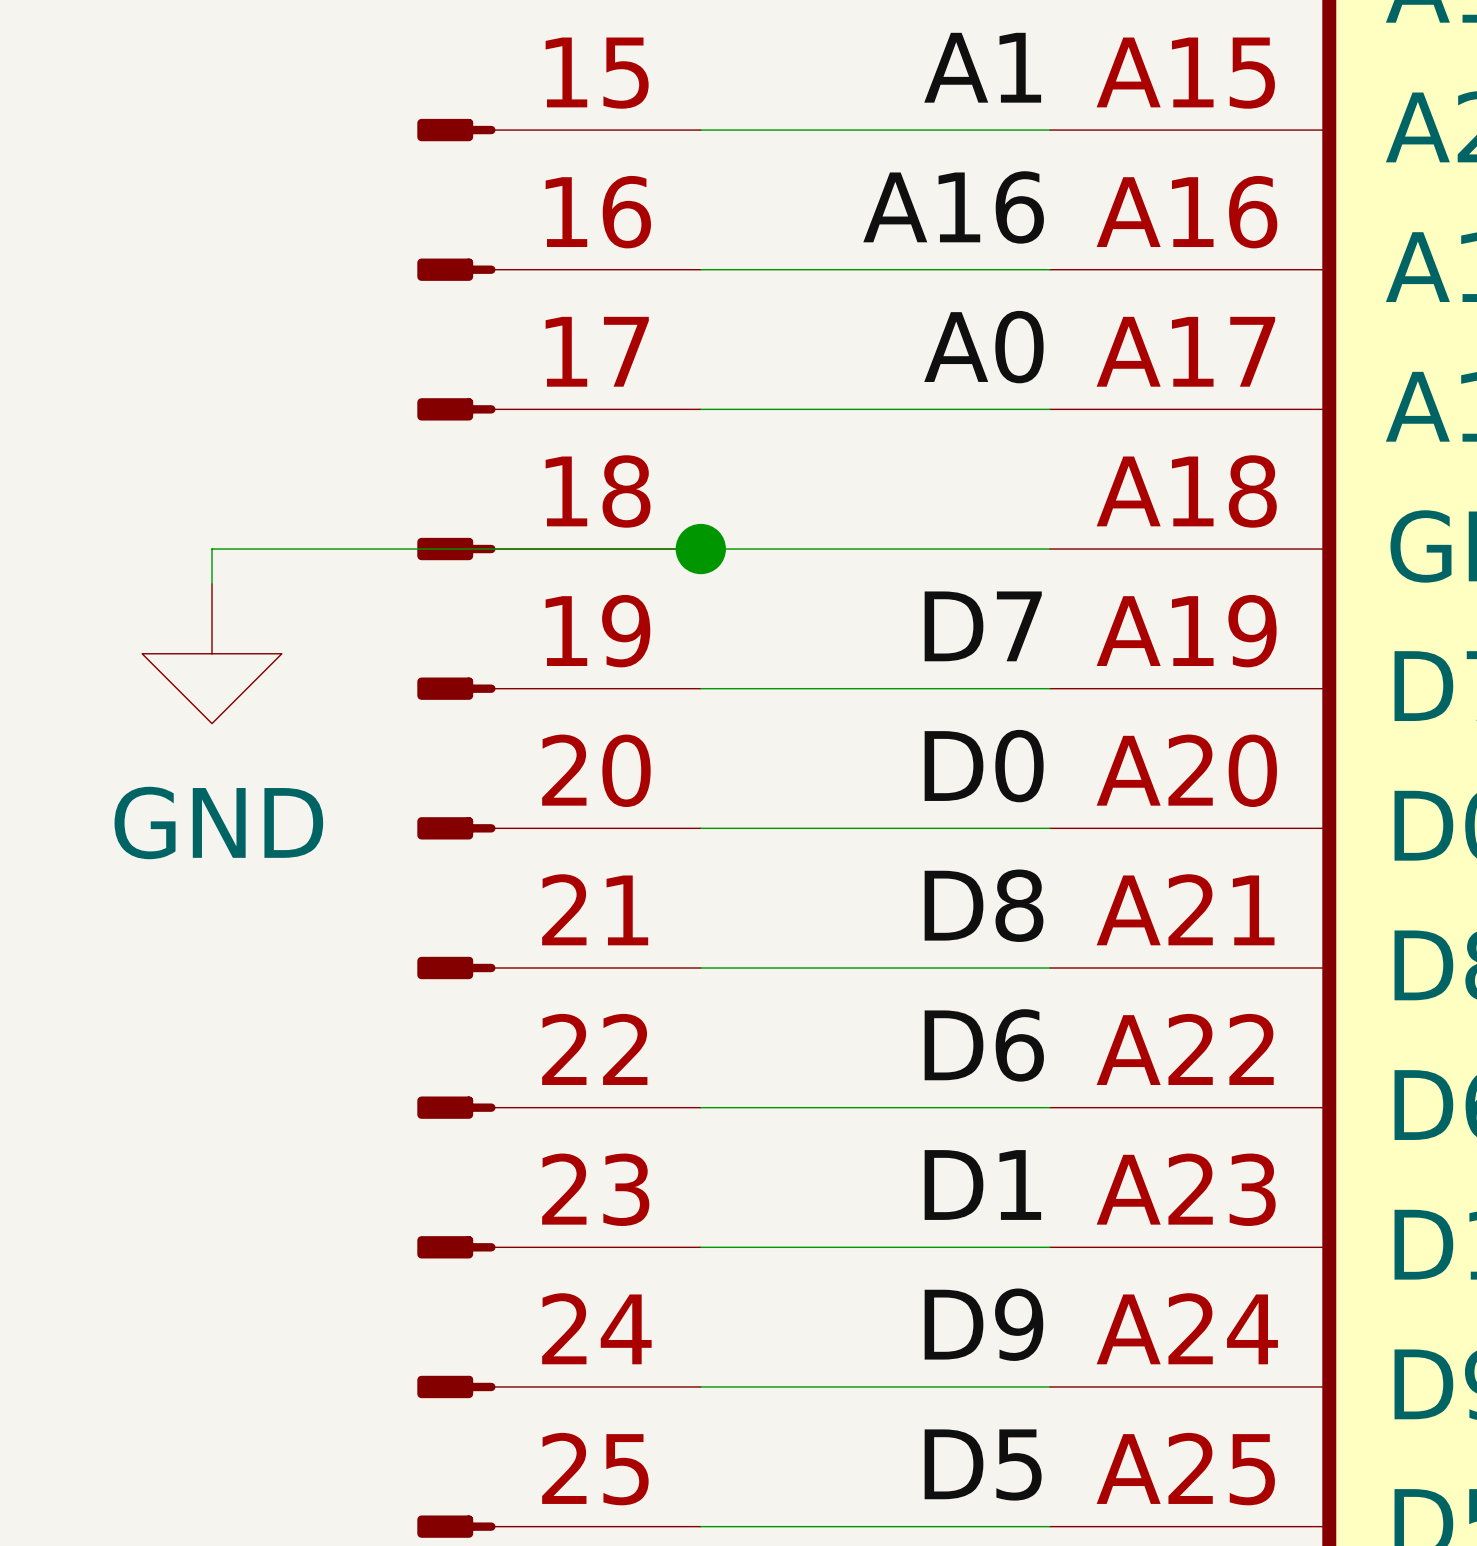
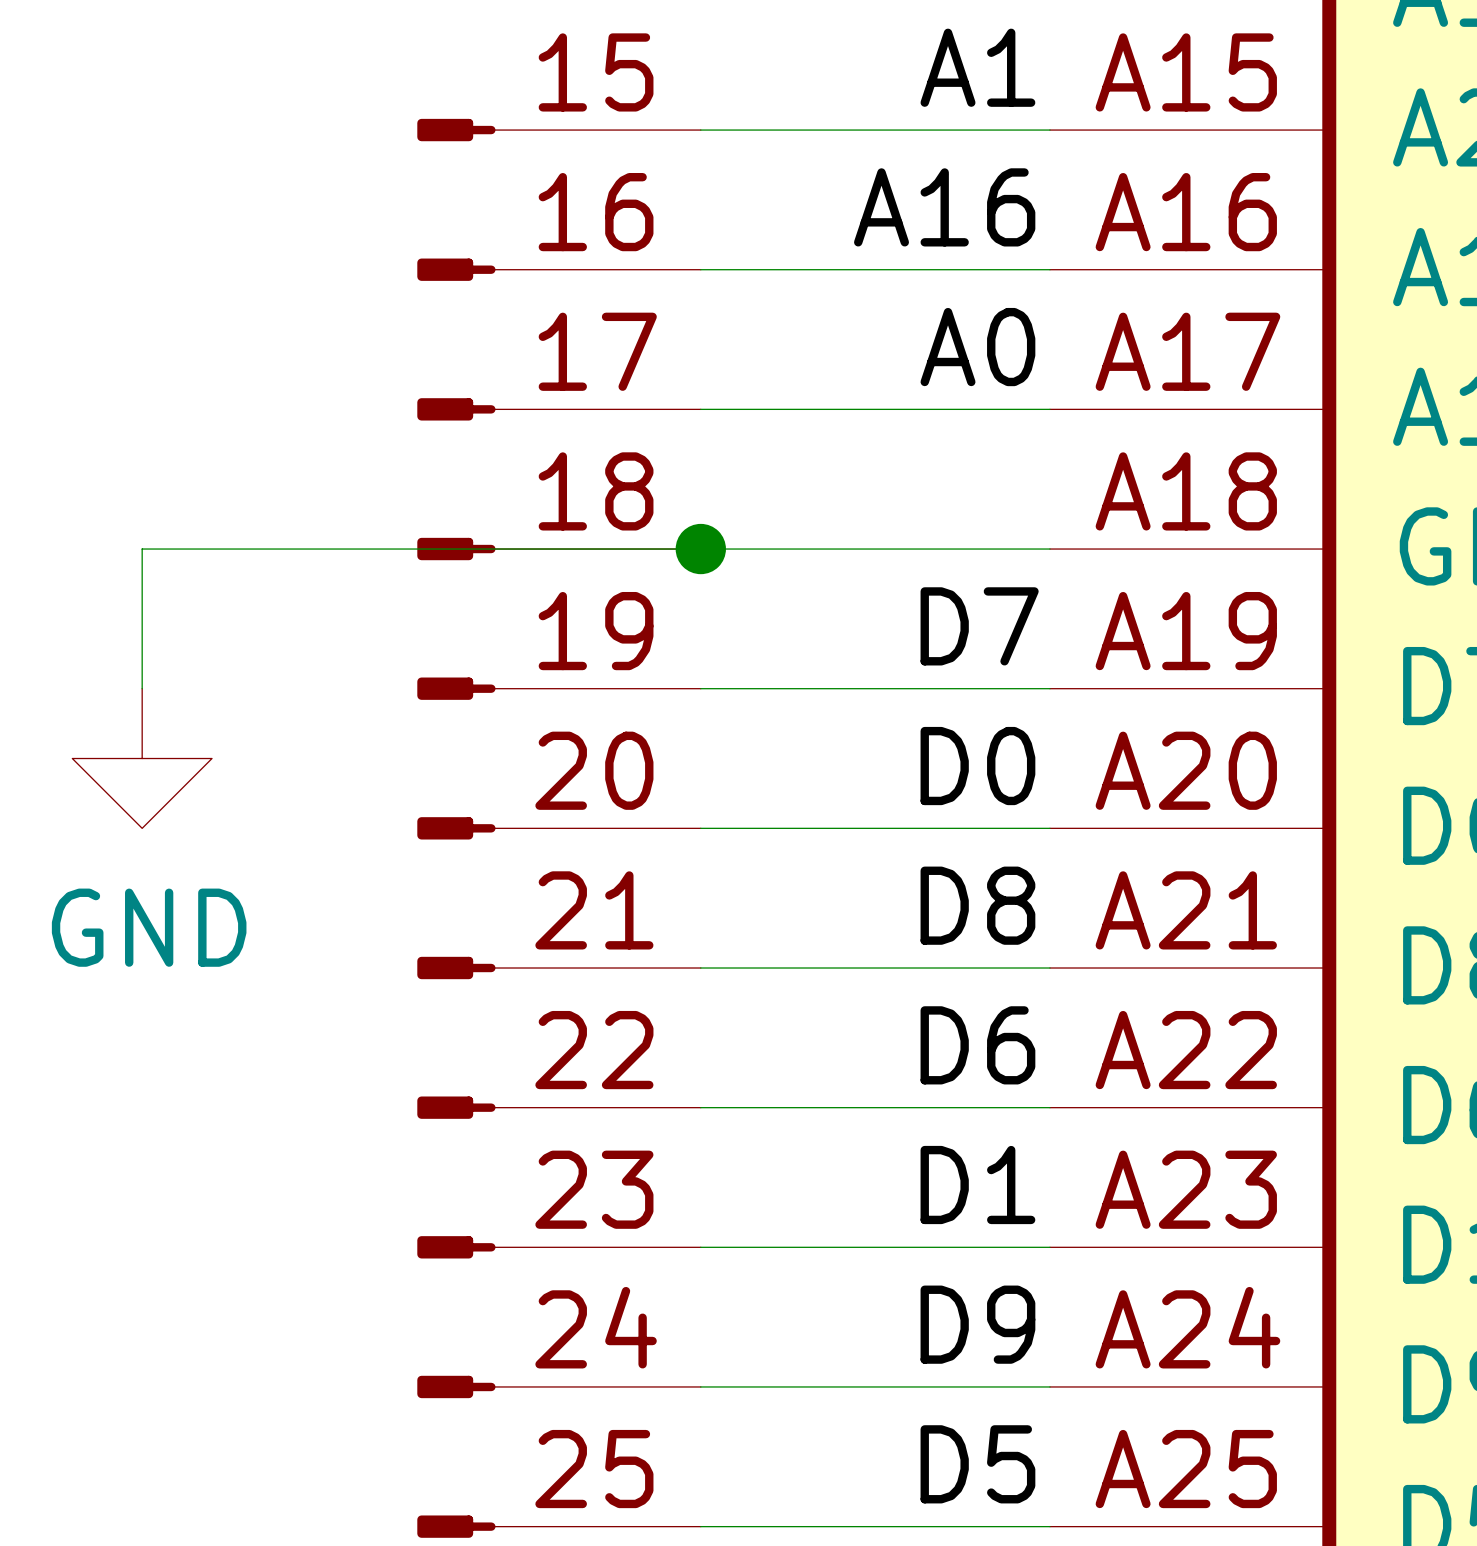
wire: (212, 549) (212, 583) -> (212, 549) (142, 549) (142, 688)
power symbol position: GND (212, 653) -> GND (142, 758)

